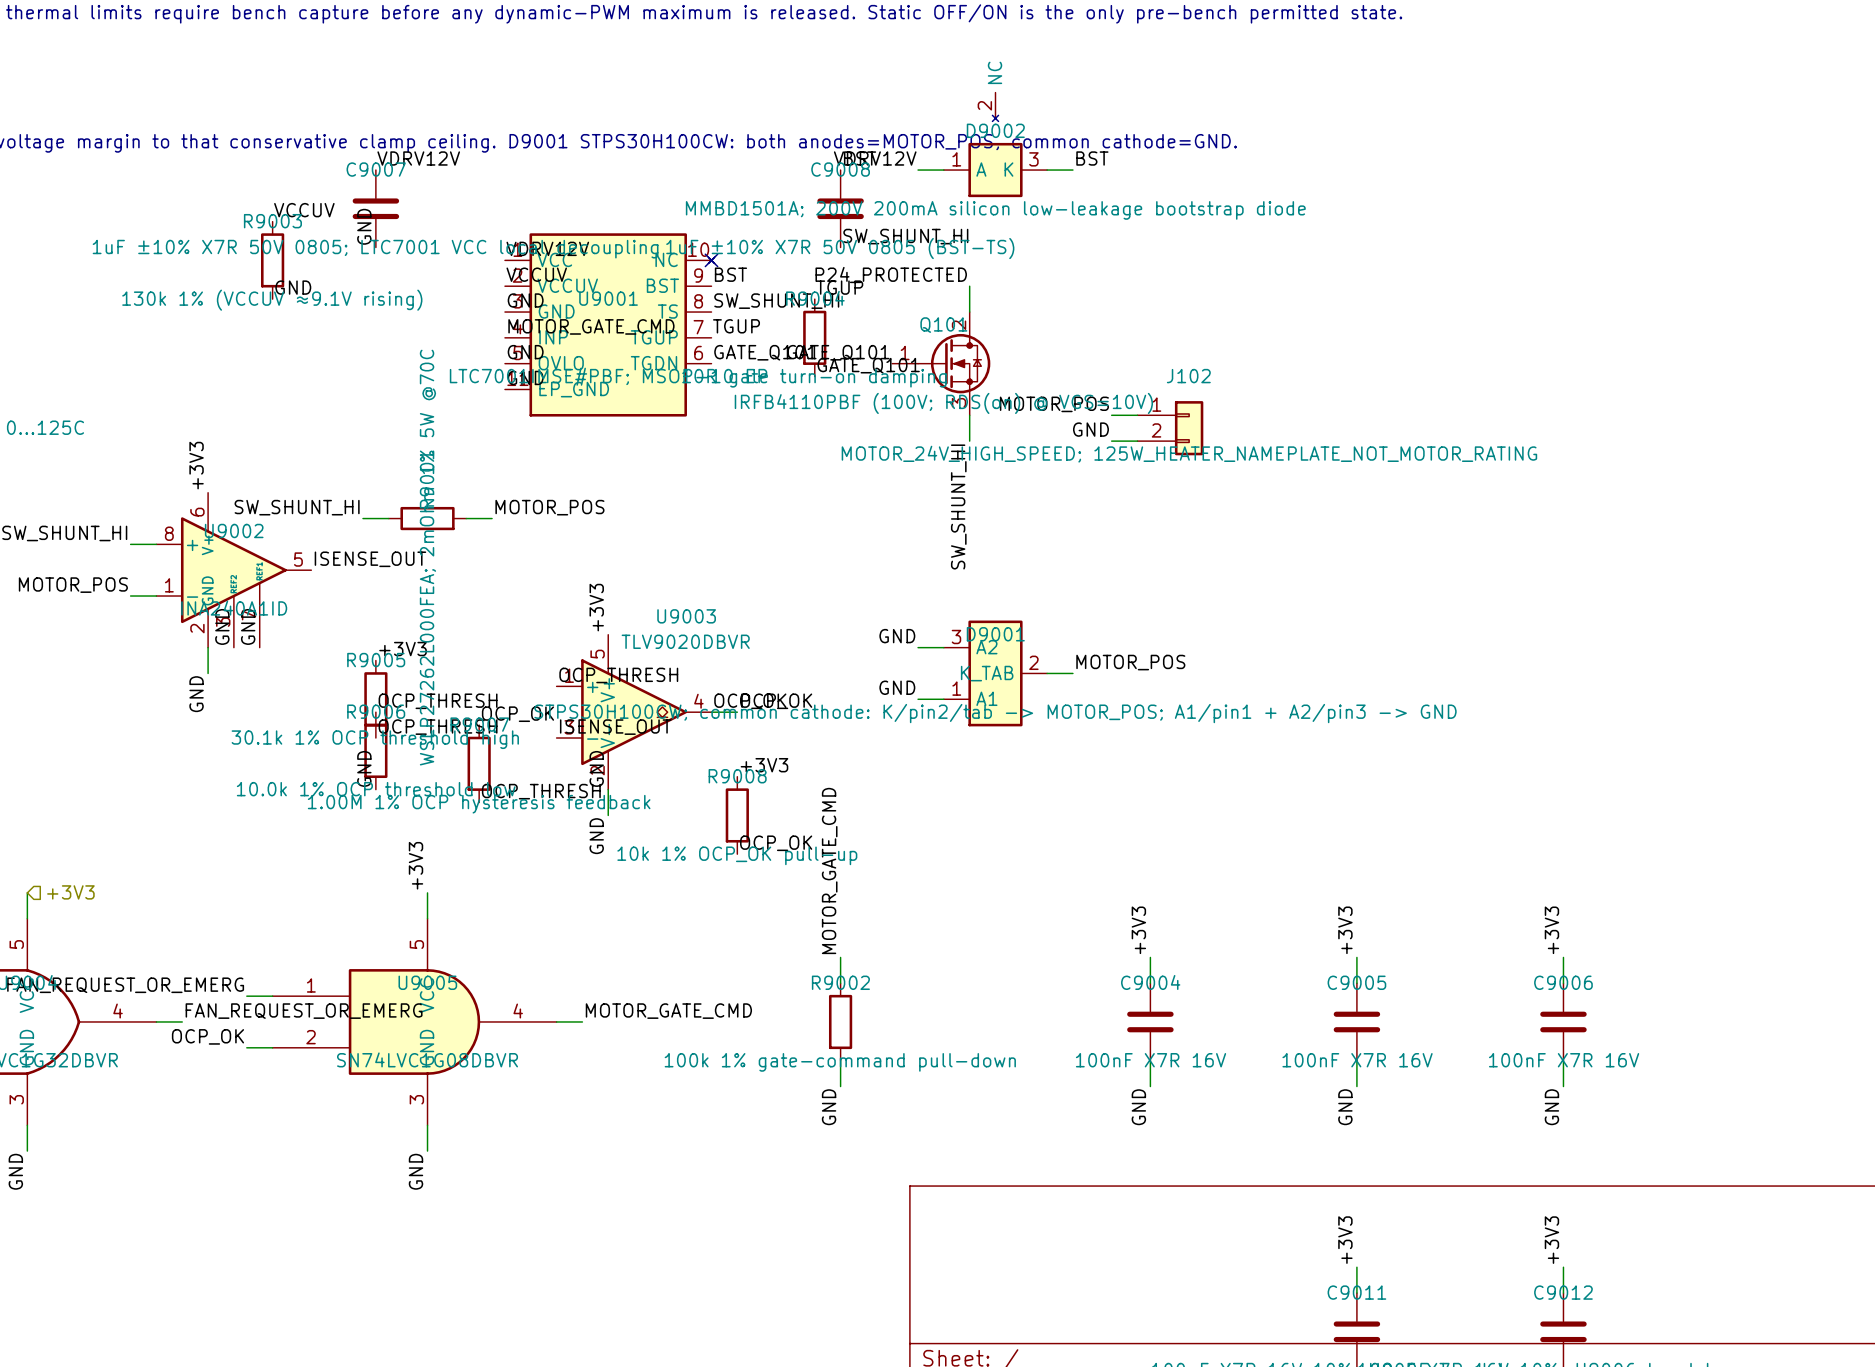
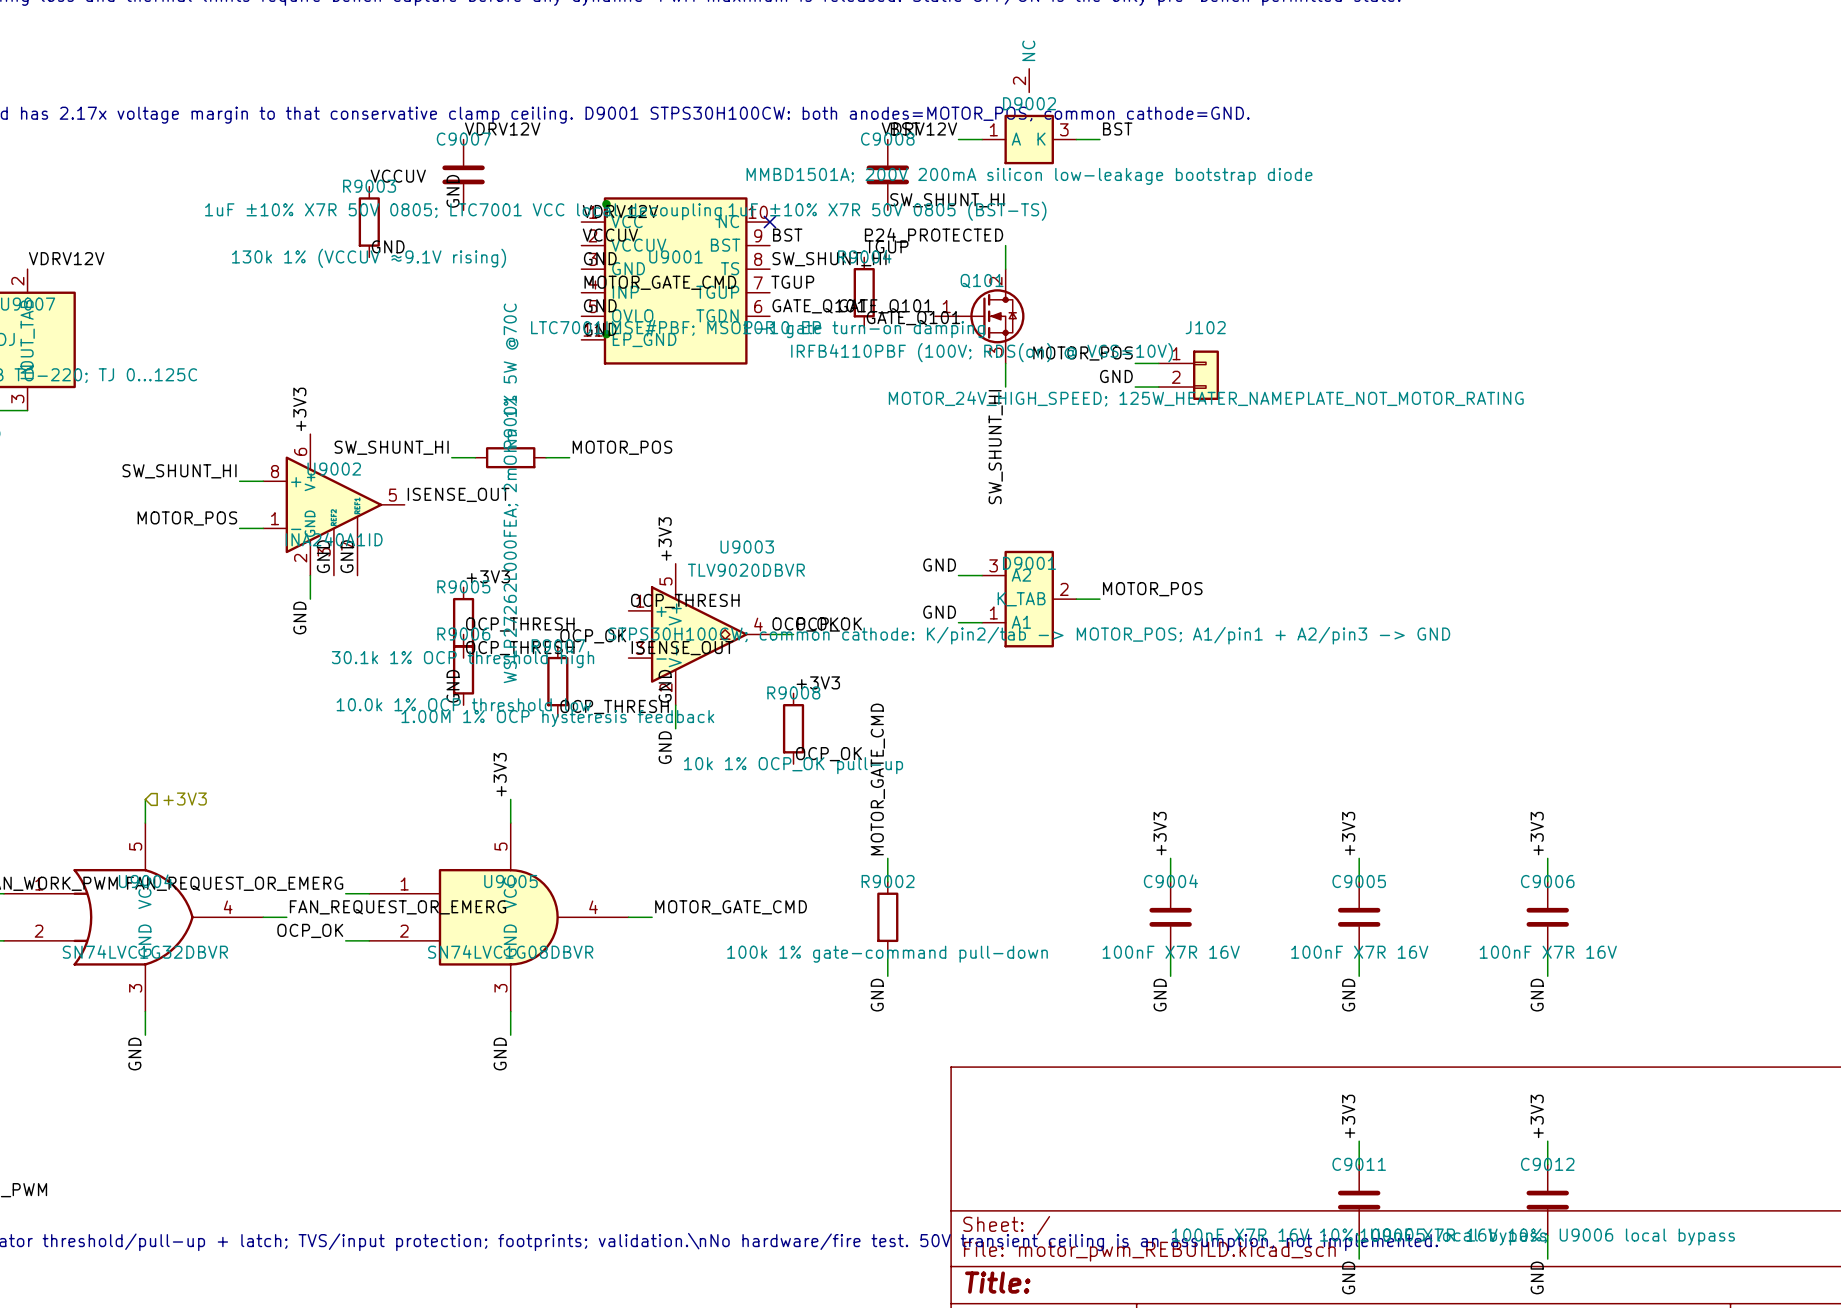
D9002 symbol: [943, 92, 1048, 198] -> [982, 68, 1077, 165]
U9001 symbol: [504, 233, 715, 417] -> [581, 197, 770, 365]
junction: none -> (606, 204)
junction: none -> (606, 334)

